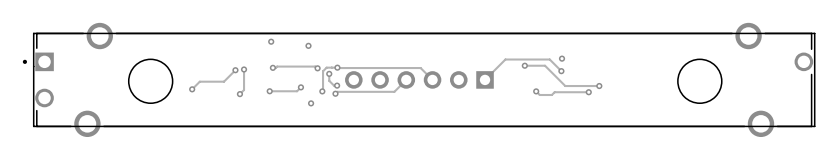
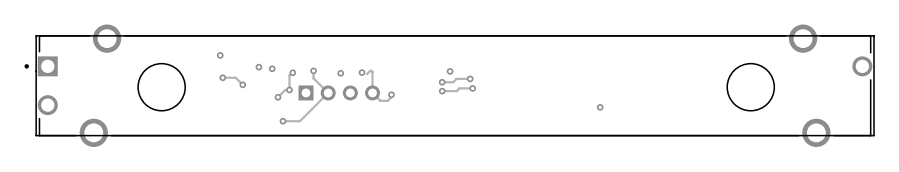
via: (271, 41) -> none
via: (308, 45) -> none
via: none -> (220, 55)
via: (562, 58) -> none
via: none -> (258, 67)
via: none -> (272, 68)
track: (524, 65) (545, 65) (565, 86) (599, 86) -> none
via: (524, 65) -> none
track: none -> (313, 70) (313, 78) (328, 92) (299, 121) (282, 121)
via: none -> (313, 70)
via: none -> (450, 71)
track: (272, 67) (315, 66) (317, 68) -> none
track: (244, 69) (244, 90) (239, 94) -> none
via: (244, 69) -> none
track: none -> (366, 74) (370, 70) (372, 71) (372, 92) (380, 100) (387, 100) (391, 94)
track: (235, 70) (223, 81) (199, 81) (192, 89) -> none
via: (235, 70) -> none
track: none -> (289, 75) (289, 89) (285, 89) (277, 97)
track: (561, 71) (549, 59) (505, 59) (485, 79) -> none
via: (561, 71) -> none
track: none -> (222, 77) (235, 77) (242, 84)
via: none -> (222, 77)
track: (329, 73) (329, 80) (334, 85) (337, 85) -> none
via: (329, 73) -> none
track: none -> (470, 78) (456, 78) (453, 82) (442, 82)
via: none -> (470, 78)
via: none -> (442, 82)
via: none -> (242, 84)
track: (406, 79) (394, 91) (337, 91) (335, 93) -> none
part: (419, 79) -> none
track: (432, 79) (420, 68) (326, 67) (323, 71) (322, 91) -> none
track: none -> (472, 88) (442, 91)
via: none -> (472, 88)
via: none -> (289, 89)
via: none -> (442, 91)
via: (337, 85) -> none
part: none -> (339, 92)
via: (599, 86) -> none
track: (300, 87) (297, 91) (269, 91) -> none
via: (300, 87) -> none
via: none -> (391, 94)
via: (192, 89) -> none
via: none -> (277, 97)
via: (269, 91) -> none
via: (322, 91) -> none
track: (536, 91) (539, 94) (551, 94) (554, 92) (588, 92) -> none
via: (536, 91) -> none
via: (588, 92) -> none
via: (335, 93) -> none
via: (239, 94) -> none
via: none -> (600, 107)
via: (311, 103) -> none
via: none -> (282, 121)

